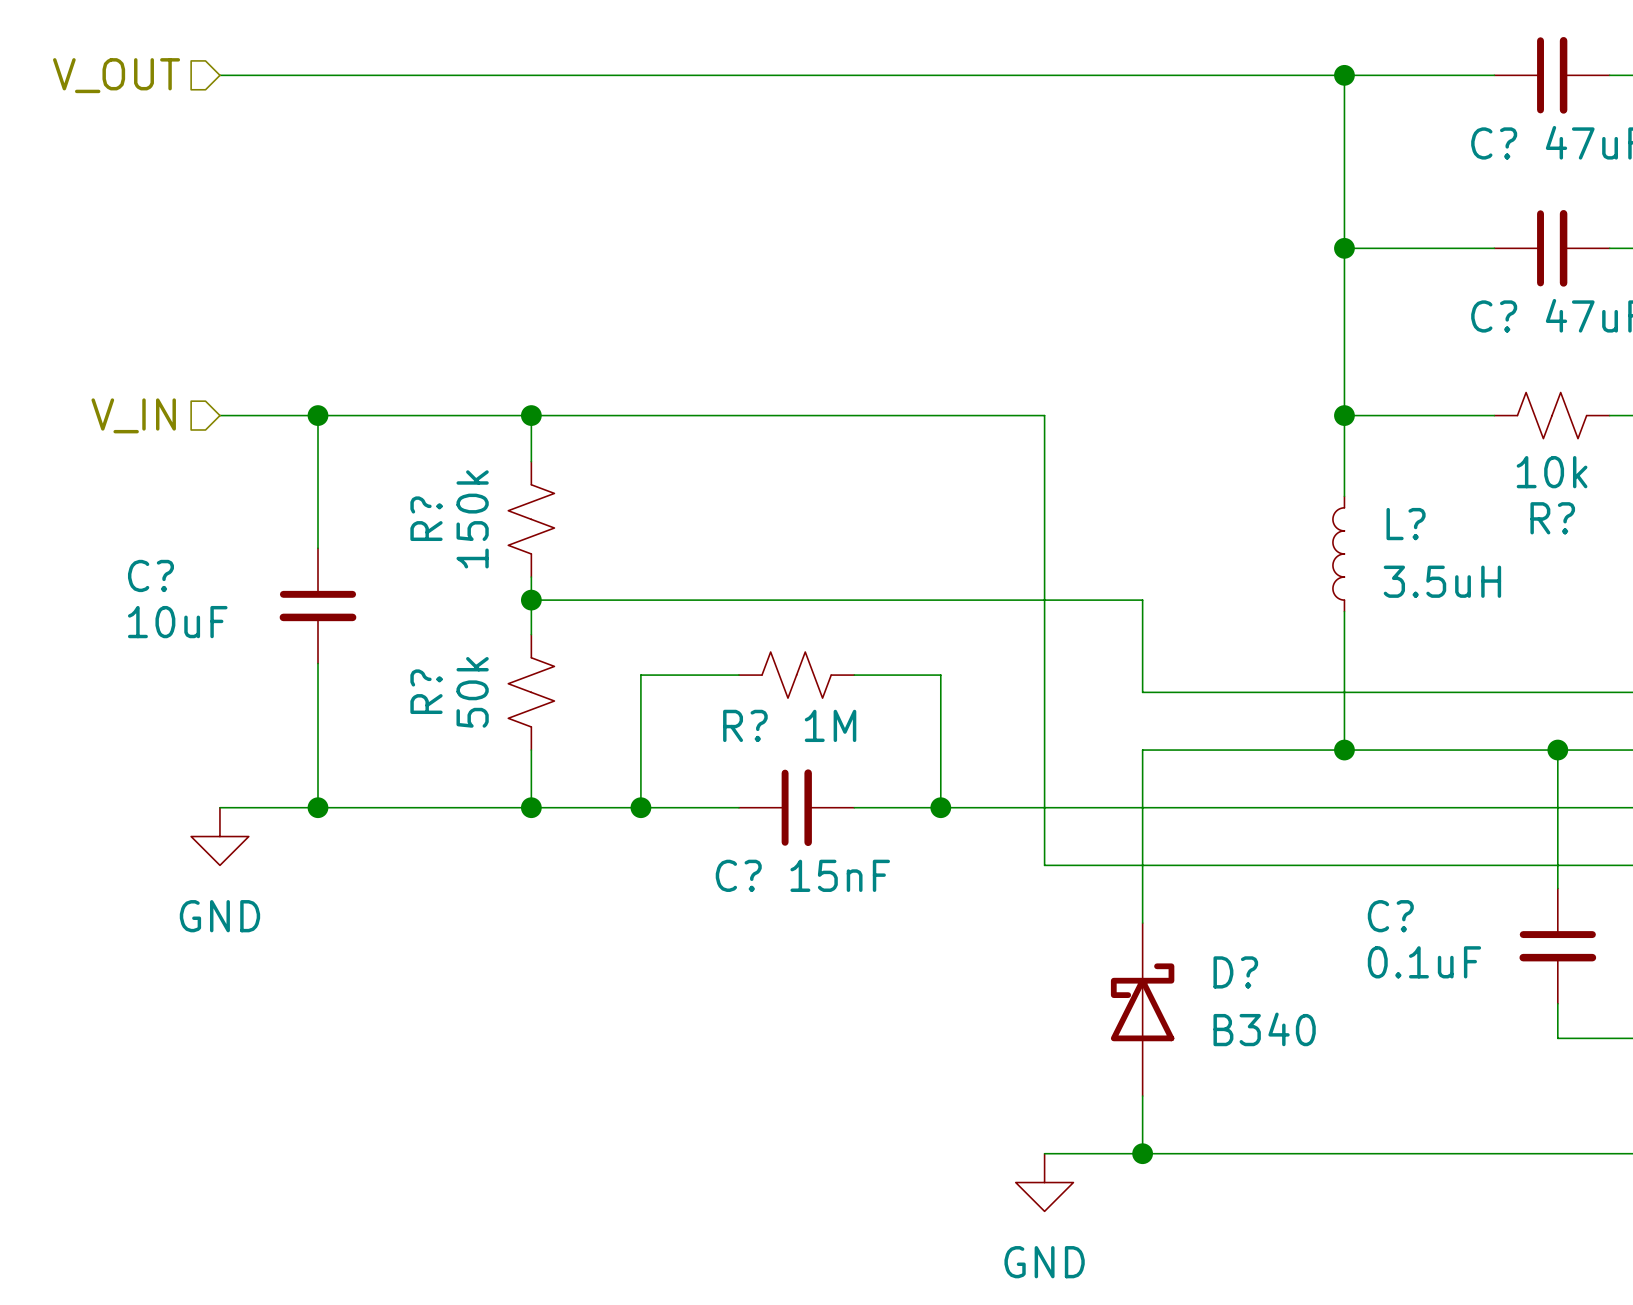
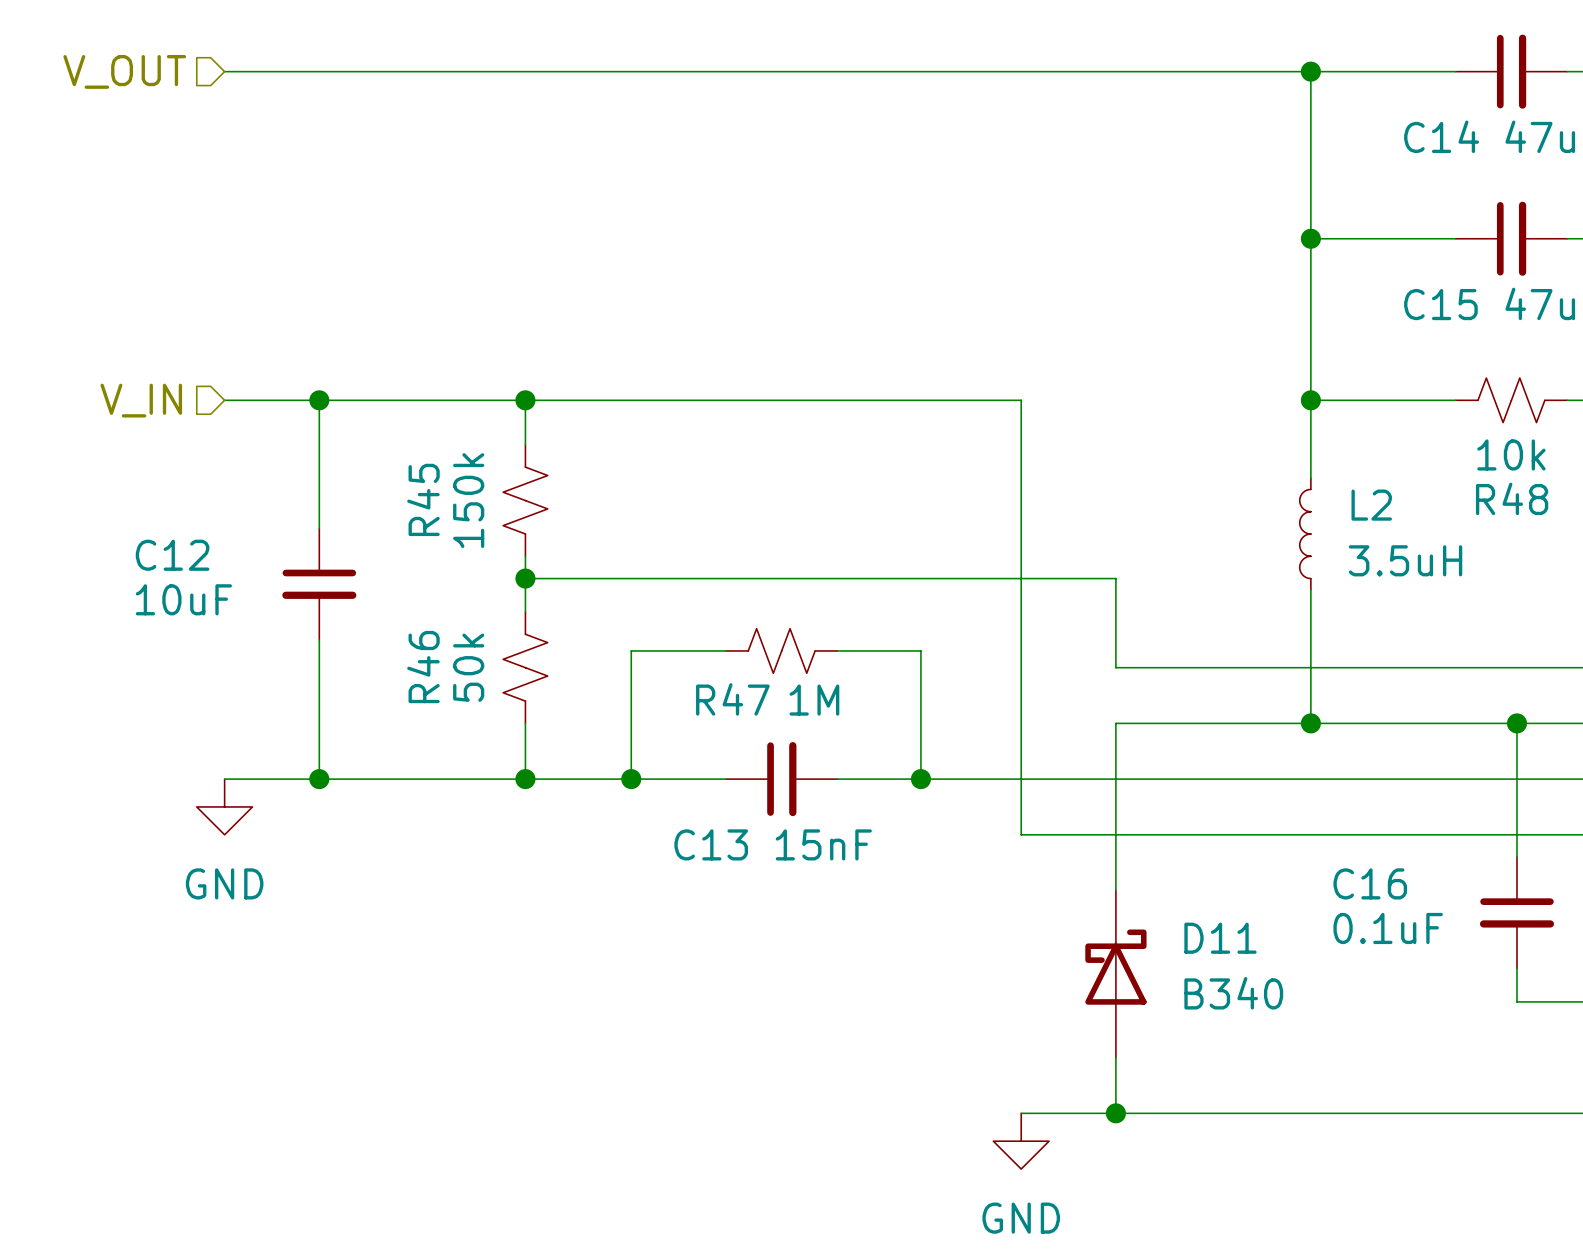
C? name: C? (1494, 143) -> C14 (1441, 136)
C? name: C? (1494, 316) -> C15 (1440, 304)
R? name: R? (426, 518) -> R45 (423, 499)
R? name: R? (1552, 518) -> R48 (1512, 498)
L? name: L? (1406, 524) -> L2 (1371, 505)
C? name: C? (150, 575) -> C12 (172, 555)
R? name: R? (426, 691) -> R46 (423, 667)
R? name: R? (745, 725) -> R47 (732, 699)
C? name: C? (738, 875) -> C13 (711, 844)
C? name: C? (1390, 916) -> C16 (1370, 883)
D? name: D? (1235, 972) -> D11 (1220, 938)

